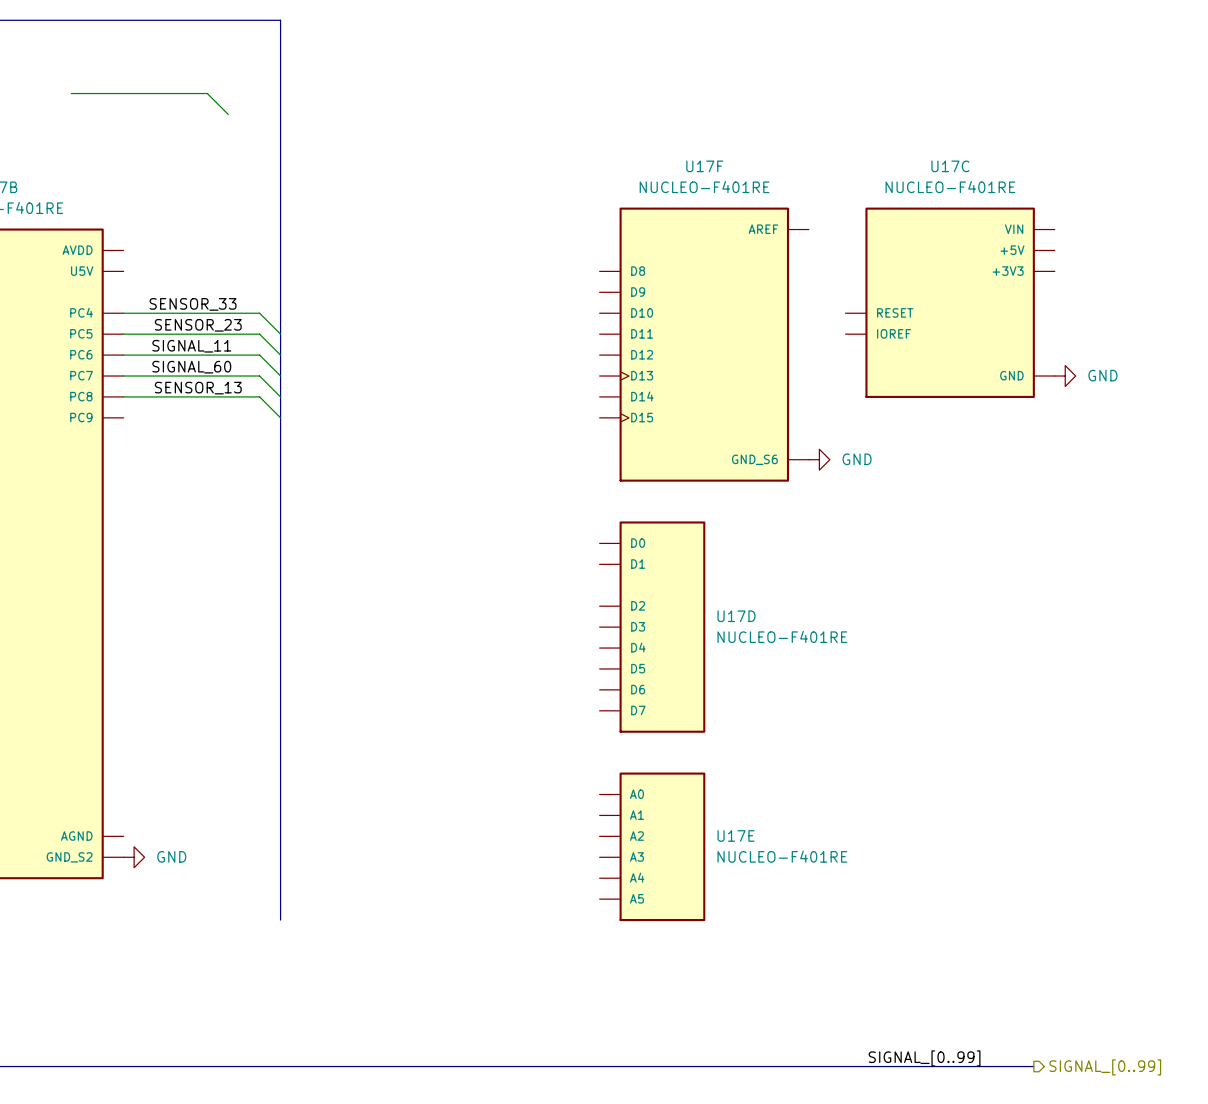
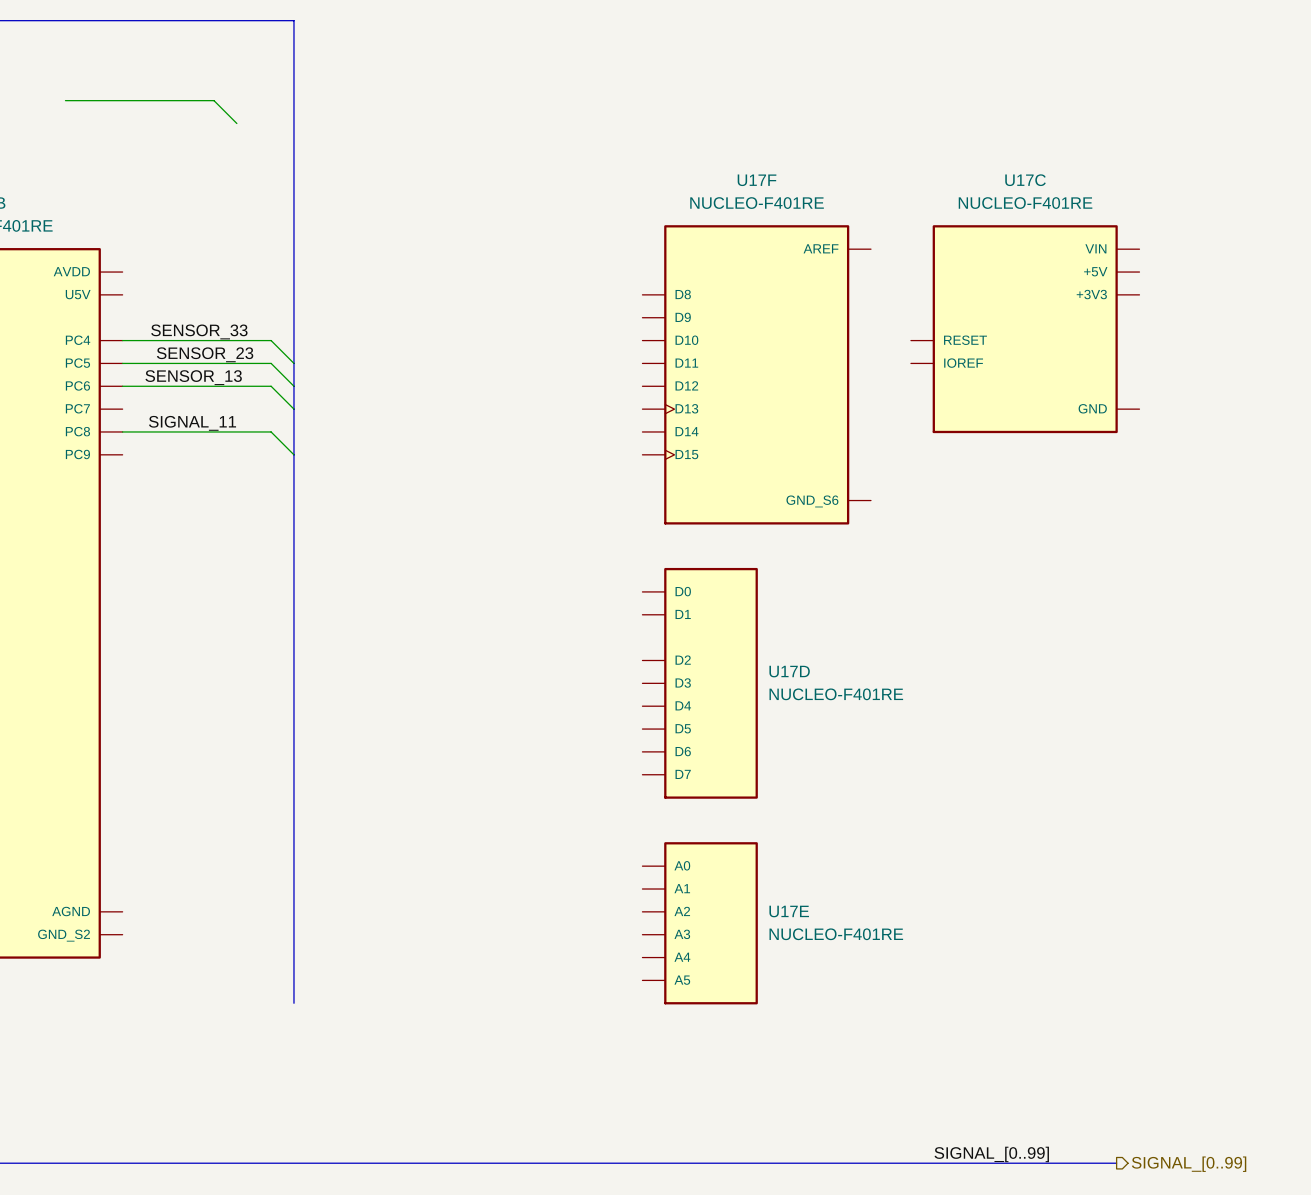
label: SIGNAL_11 (191, 346) -> SENSOR_13 (193, 377)
label: SIGNAL_60 (191, 367) -> SIGNAL_11 (192, 423)
wire: (123, 376) (259, 376) (280, 396) -> none
power symbol: GND (1065, 376) -> none
label: SENSOR_13 (198, 388) -> none
power symbol: GND (819, 459) -> none
power symbol: GND (134, 857) -> none

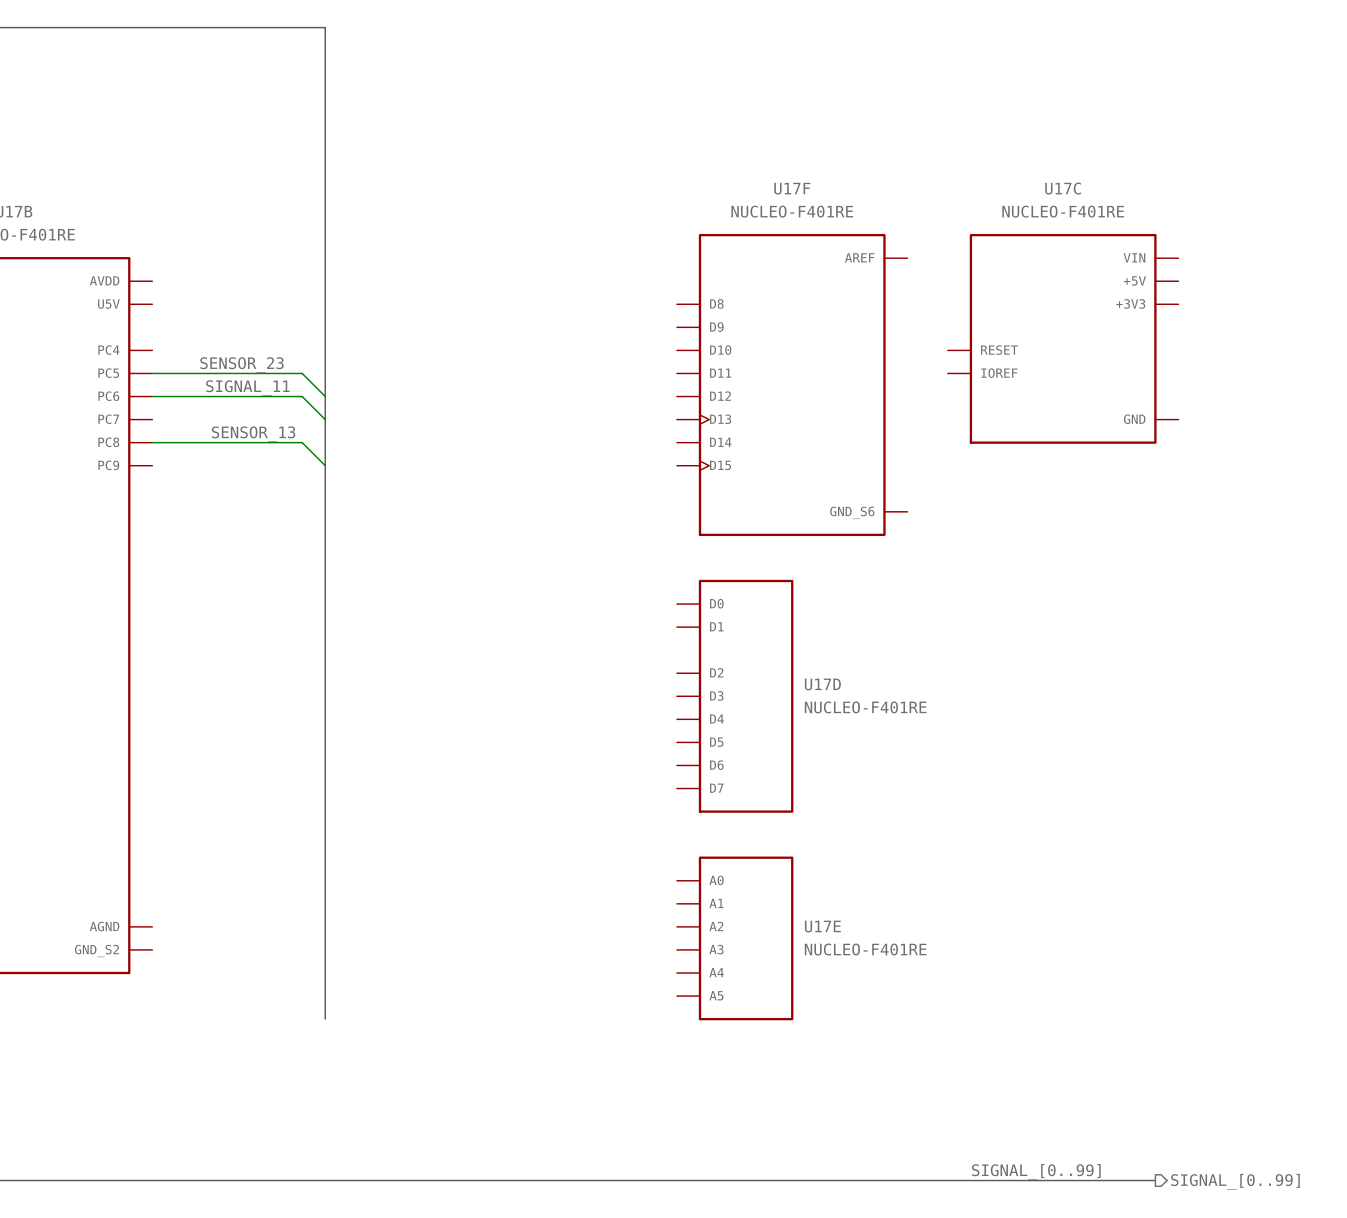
wire: (65, 100) (214, 100) (236, 123) -> none
label: SENSOR_33 (199, 331) -> none
wire: (122, 340) (271, 340) (293, 363) -> none
label position: SENSOR_13 (193, 377) -> SENSOR_13 (253, 434)
label position: SIGNAL_11 (192, 423) -> SIGNAL_11 (247, 388)

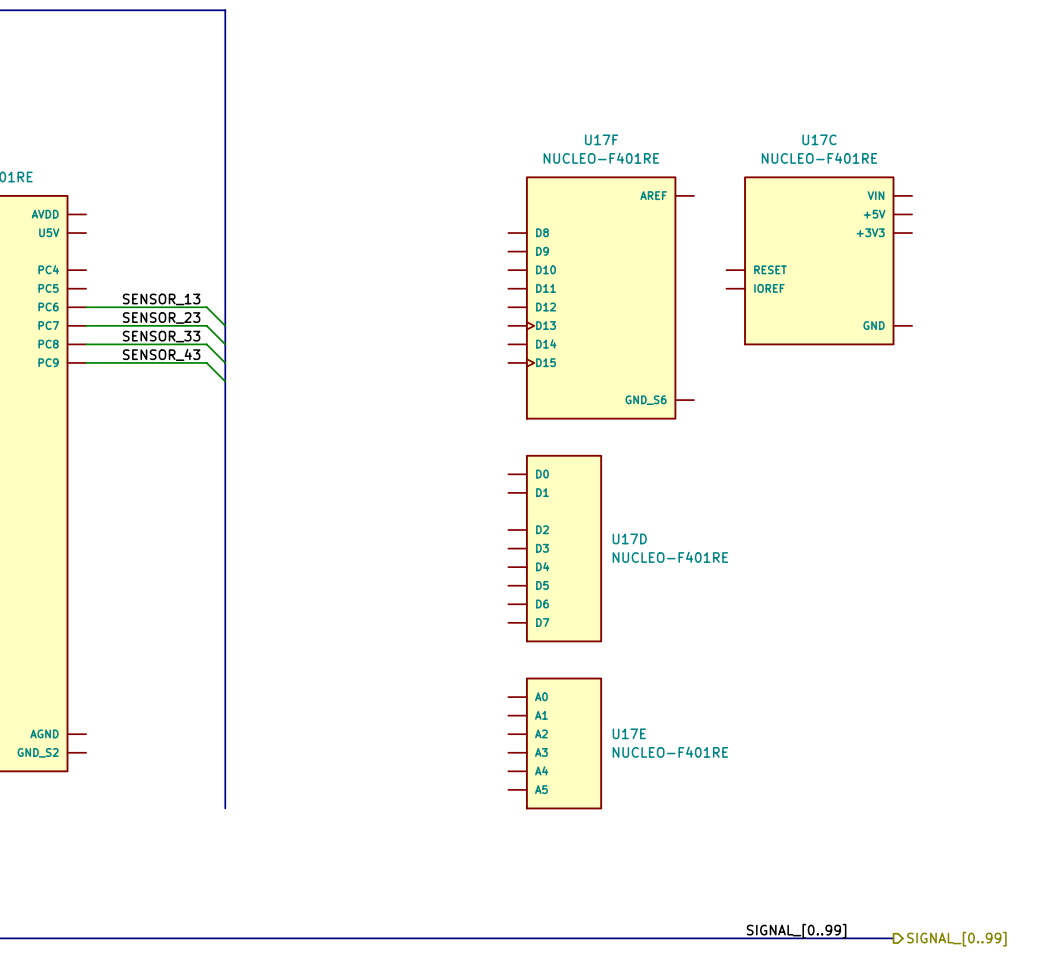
label position: SENSOR_23 (242, 364) -> SENSOR_23 (161, 318)
wire: (152, 373) (302, 373) (325, 396) -> (86, 325) (206, 325) (225, 344)
label: SIGNAL_11 (247, 388) -> SENSOR_13 (161, 299)
label: SENSOR_13 (253, 434) -> SENSOR_33 (161, 336)
label: none -> SENSOR_43 (161, 354)
wire: none -> (86, 362) (206, 362) (225, 381)

